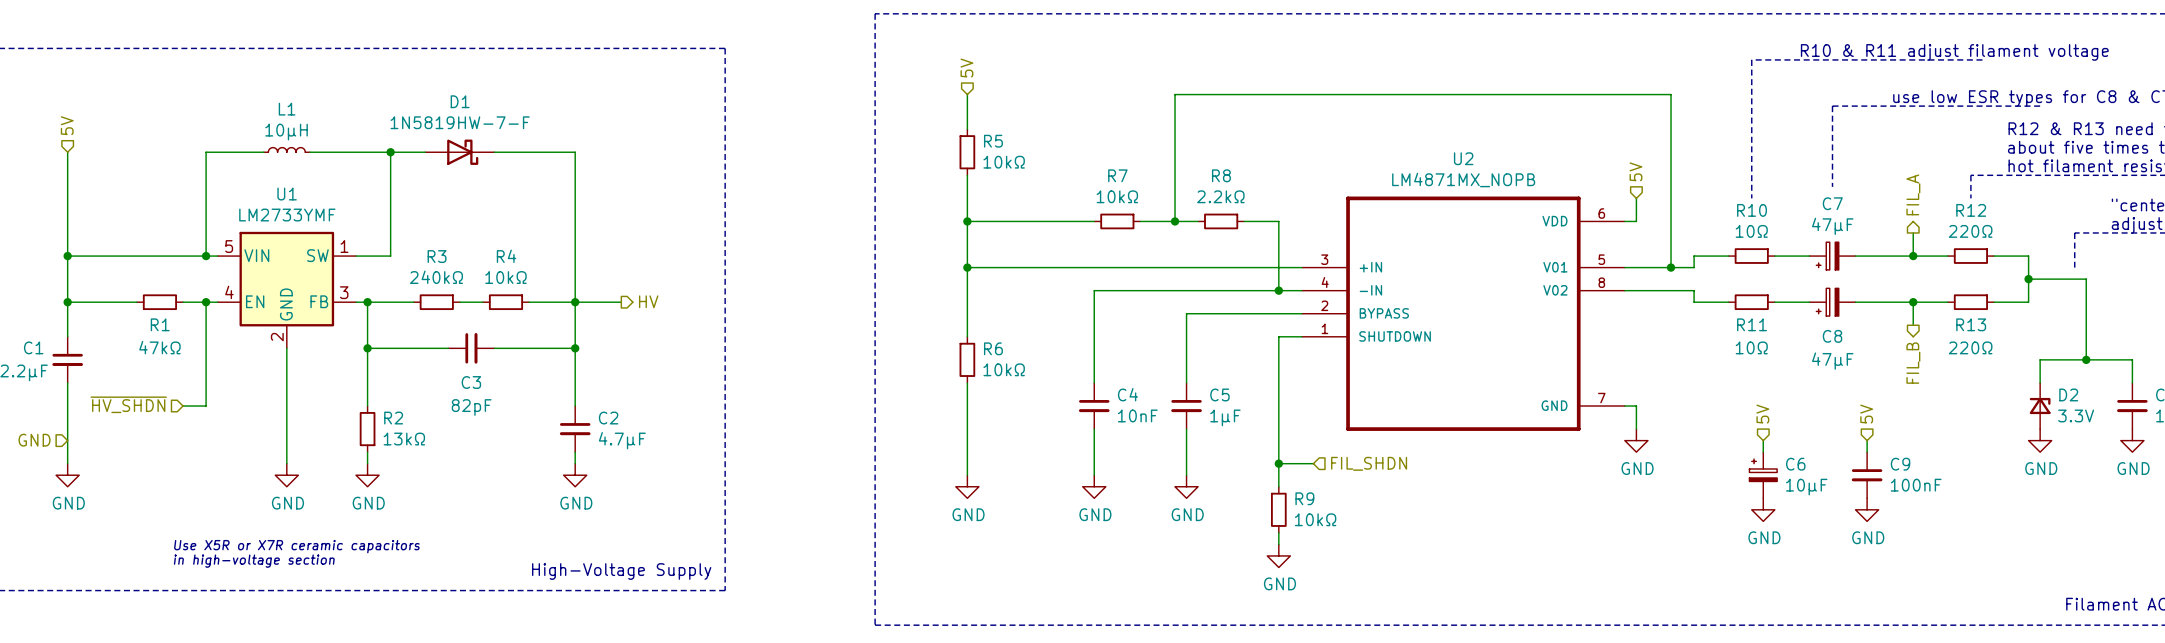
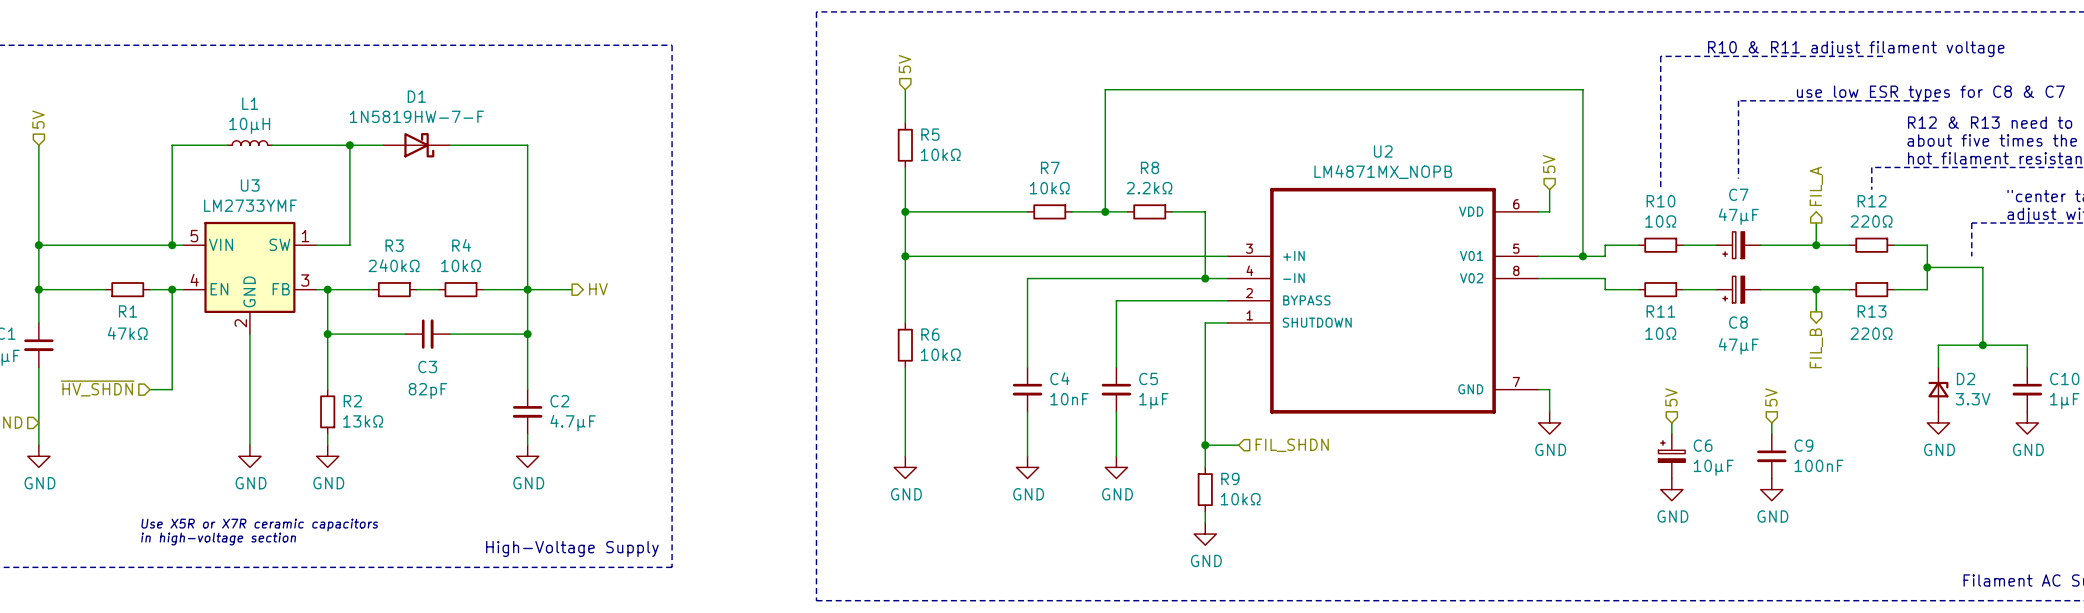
U1 name: U1 (287, 194) -> U3 (250, 185)

